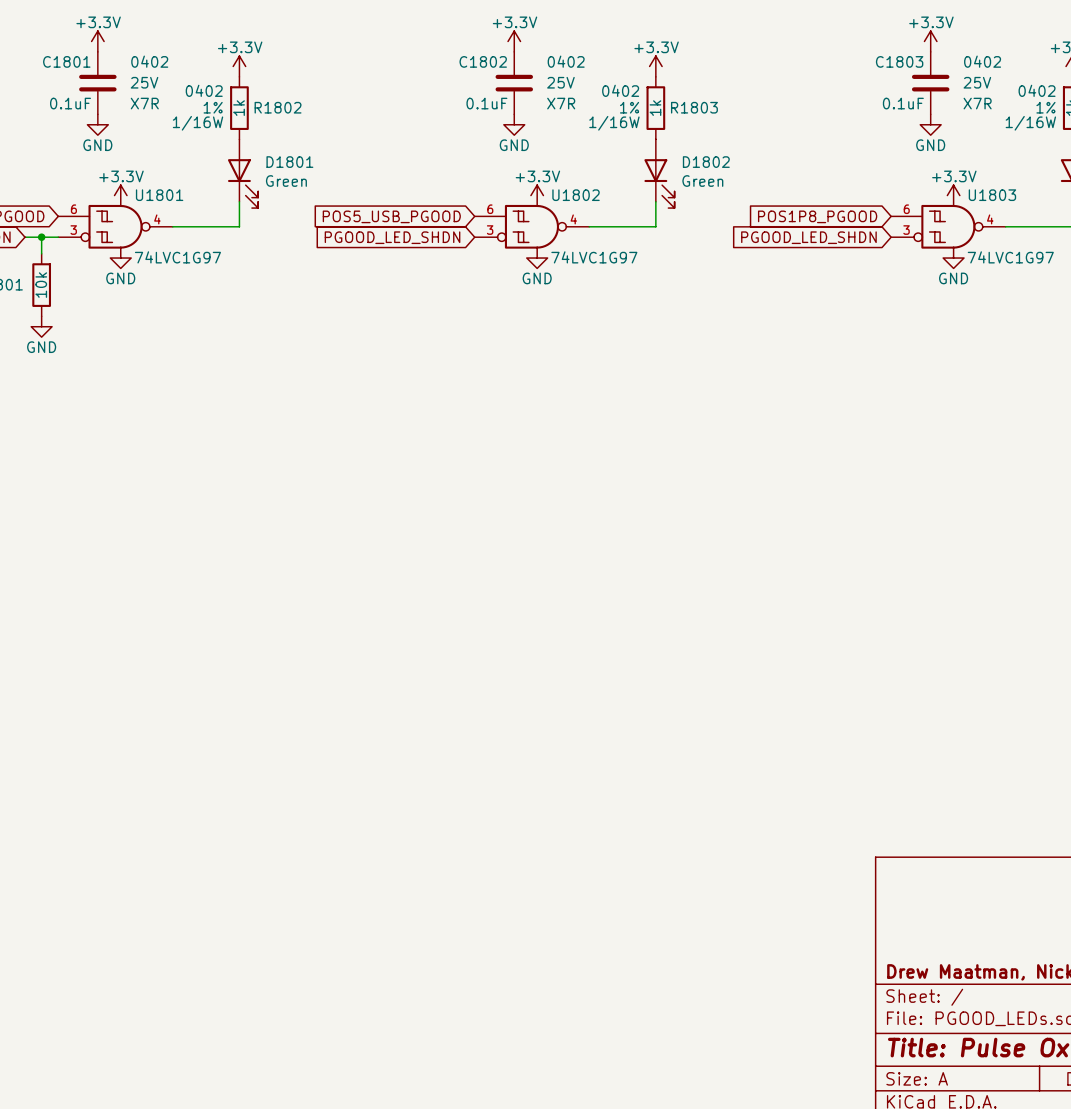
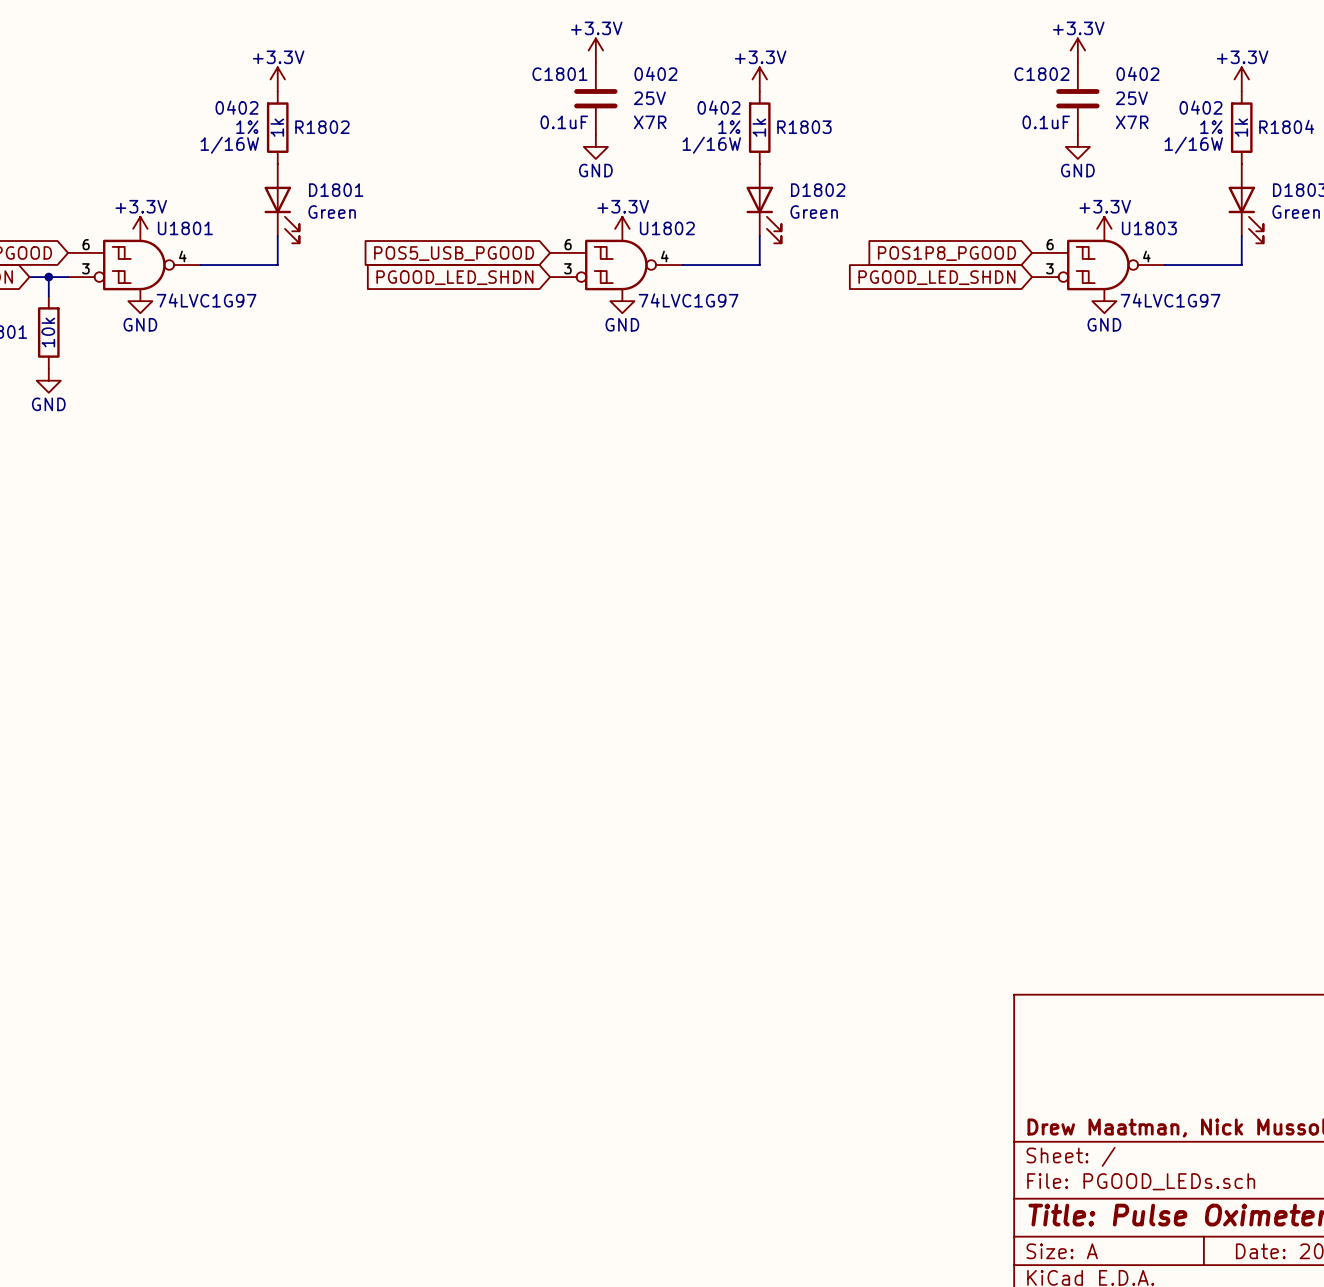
power symbol: +3.3V (97, 41) -> none
C1802 name: C1802 (483, 61) -> C1801 (559, 74)
C1803 name: C1803 (899, 61) -> C1802 (1041, 74)
C1801: 0.1uF (97, 83) -> none
power symbol: GND (97, 124) -> none

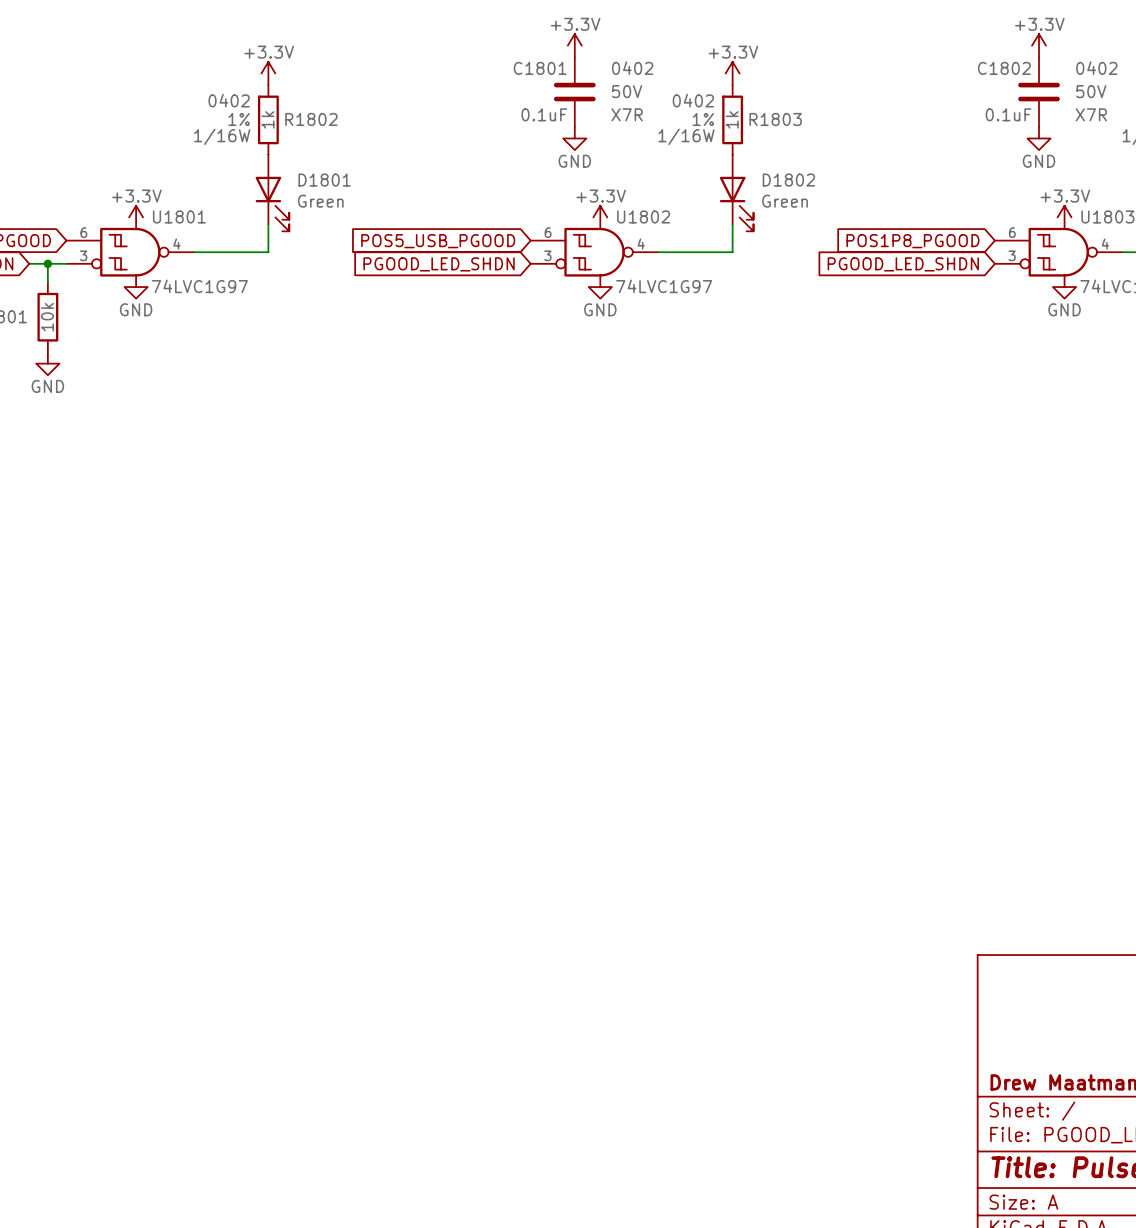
C1801 text: 25V (649, 98) -> 50V (627, 91)
C1802 text: 25V (1131, 98) -> 50V (1091, 91)

